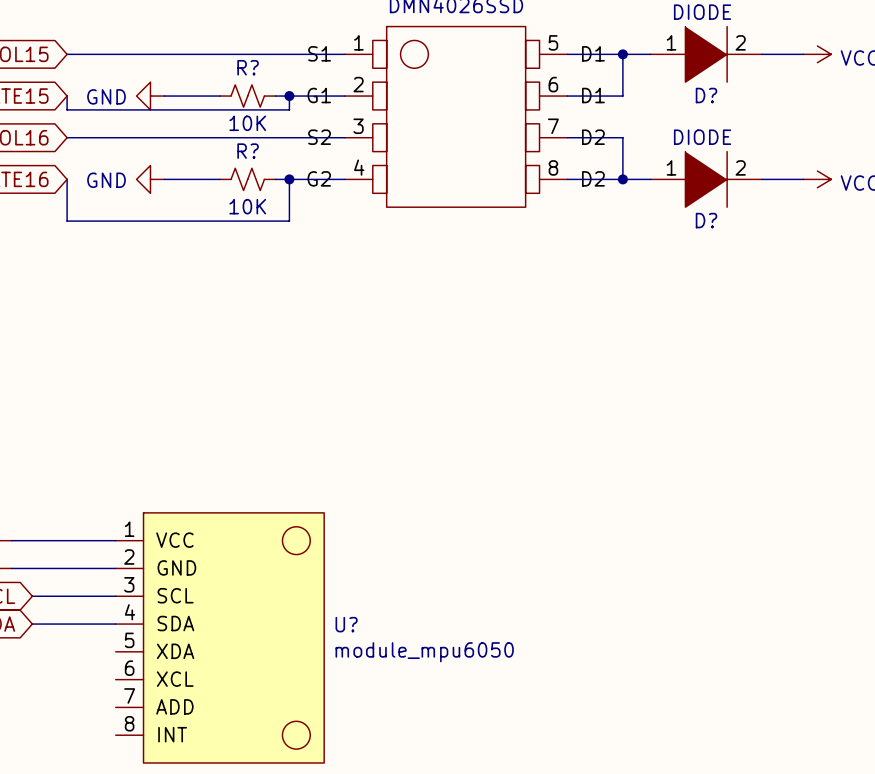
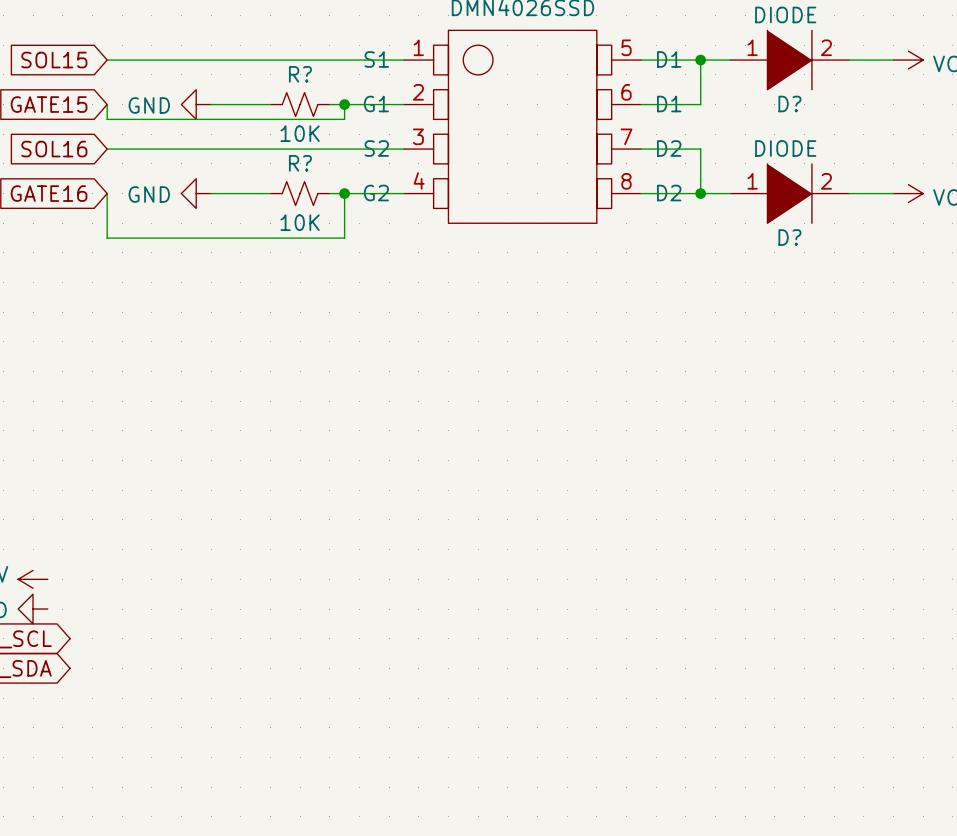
wire: (11, 540) (115, 540) -> none
wire: (11, 568) (115, 568) -> none
wire: (32, 596) (115, 596) -> none
wire: (32, 624) (115, 624) -> none
U?: module_mpu6050 (219, 637) -> none

